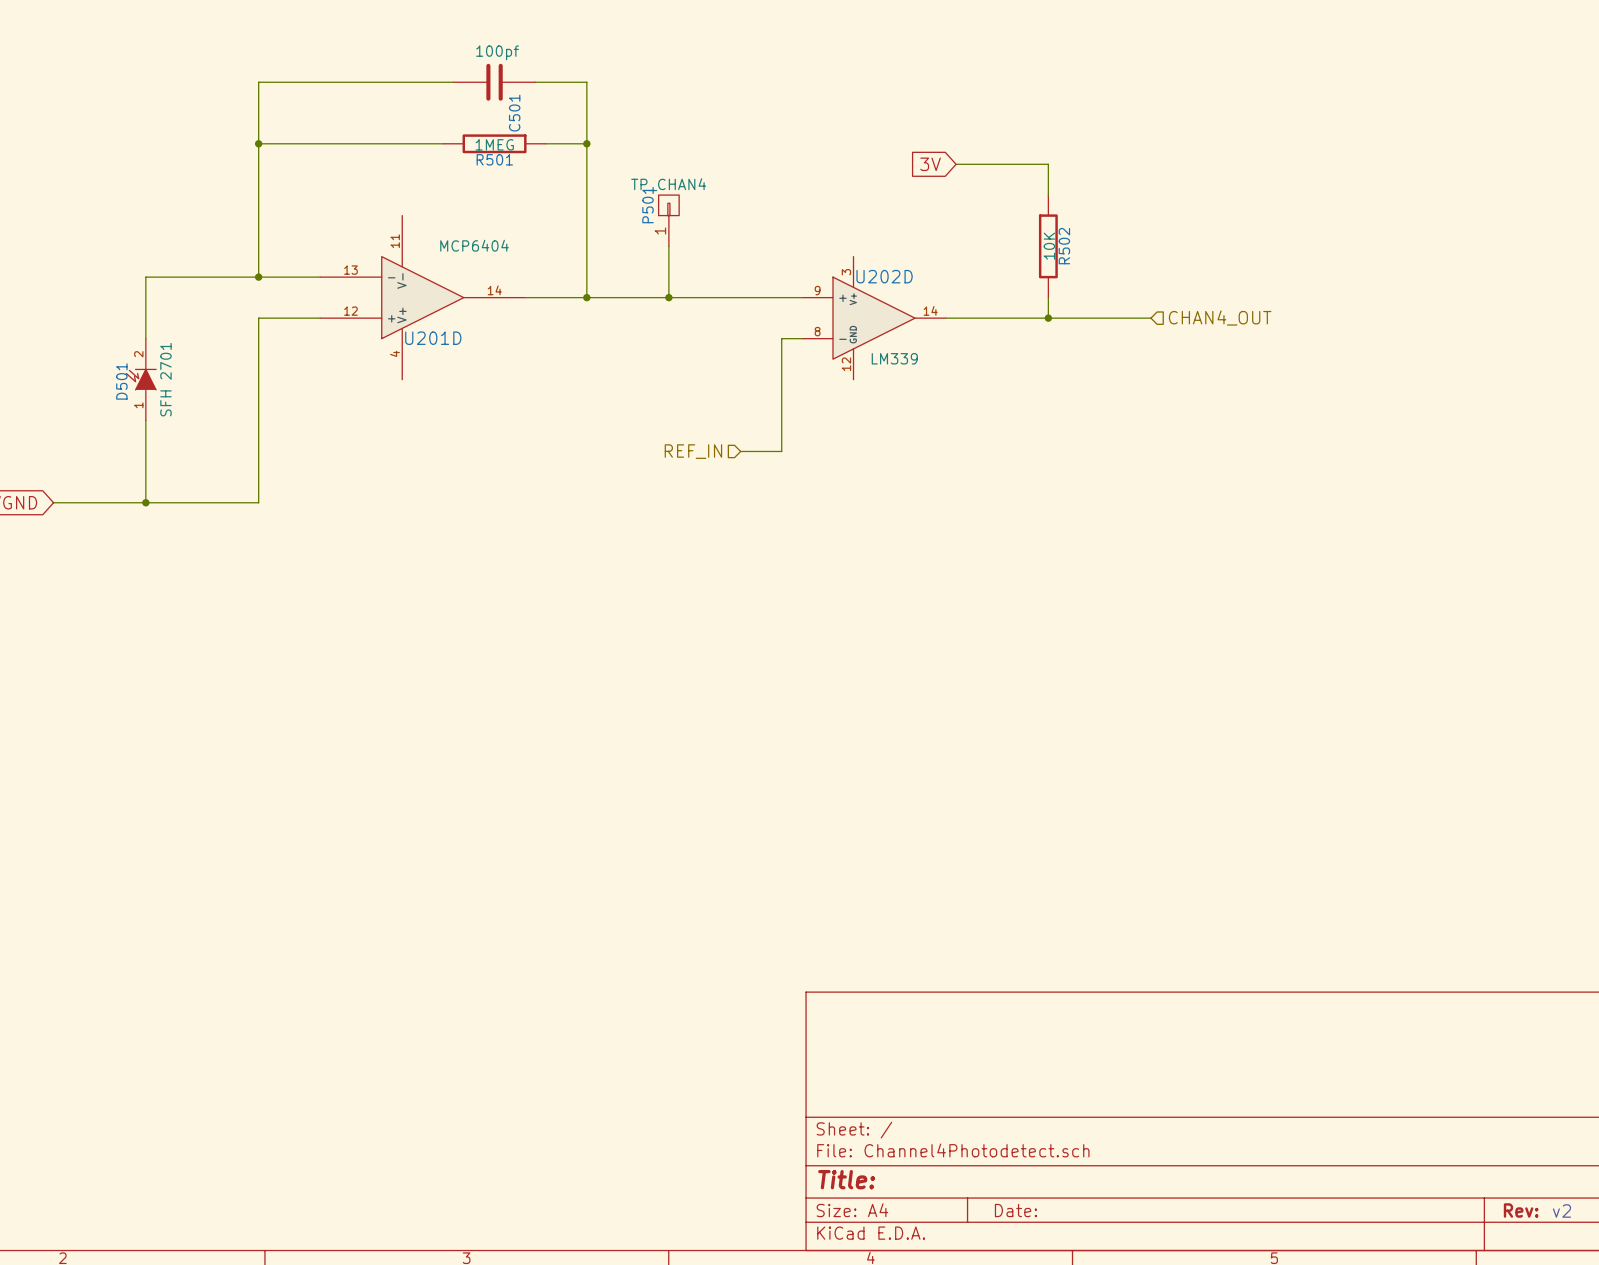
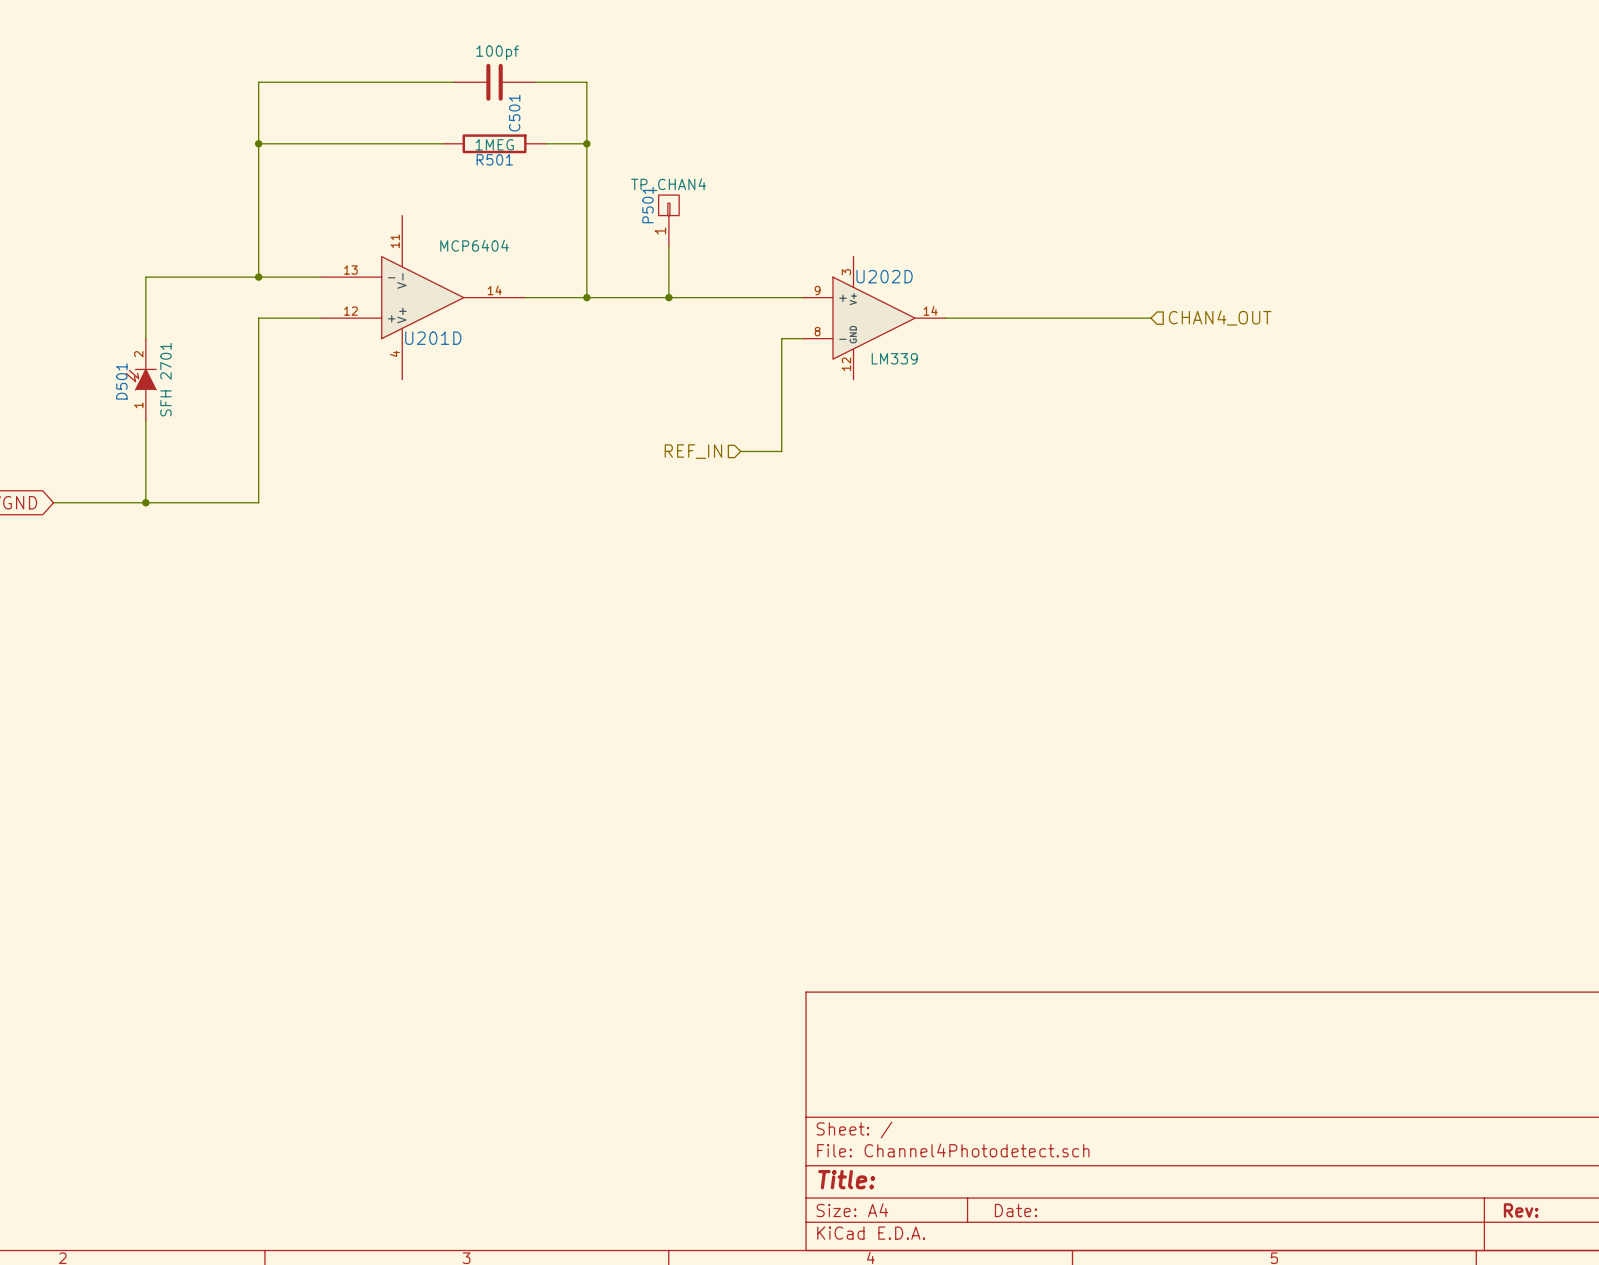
global label: 3V (930, 164) -> none
wire: (956, 164) (1048, 164) (1048, 195) -> none
R502: 10K (1048, 246) -> none
wire: (1048, 297) (1048, 318) -> none
junction: (1048, 318) -> none
text: v2 (1561, 1210) -> none

